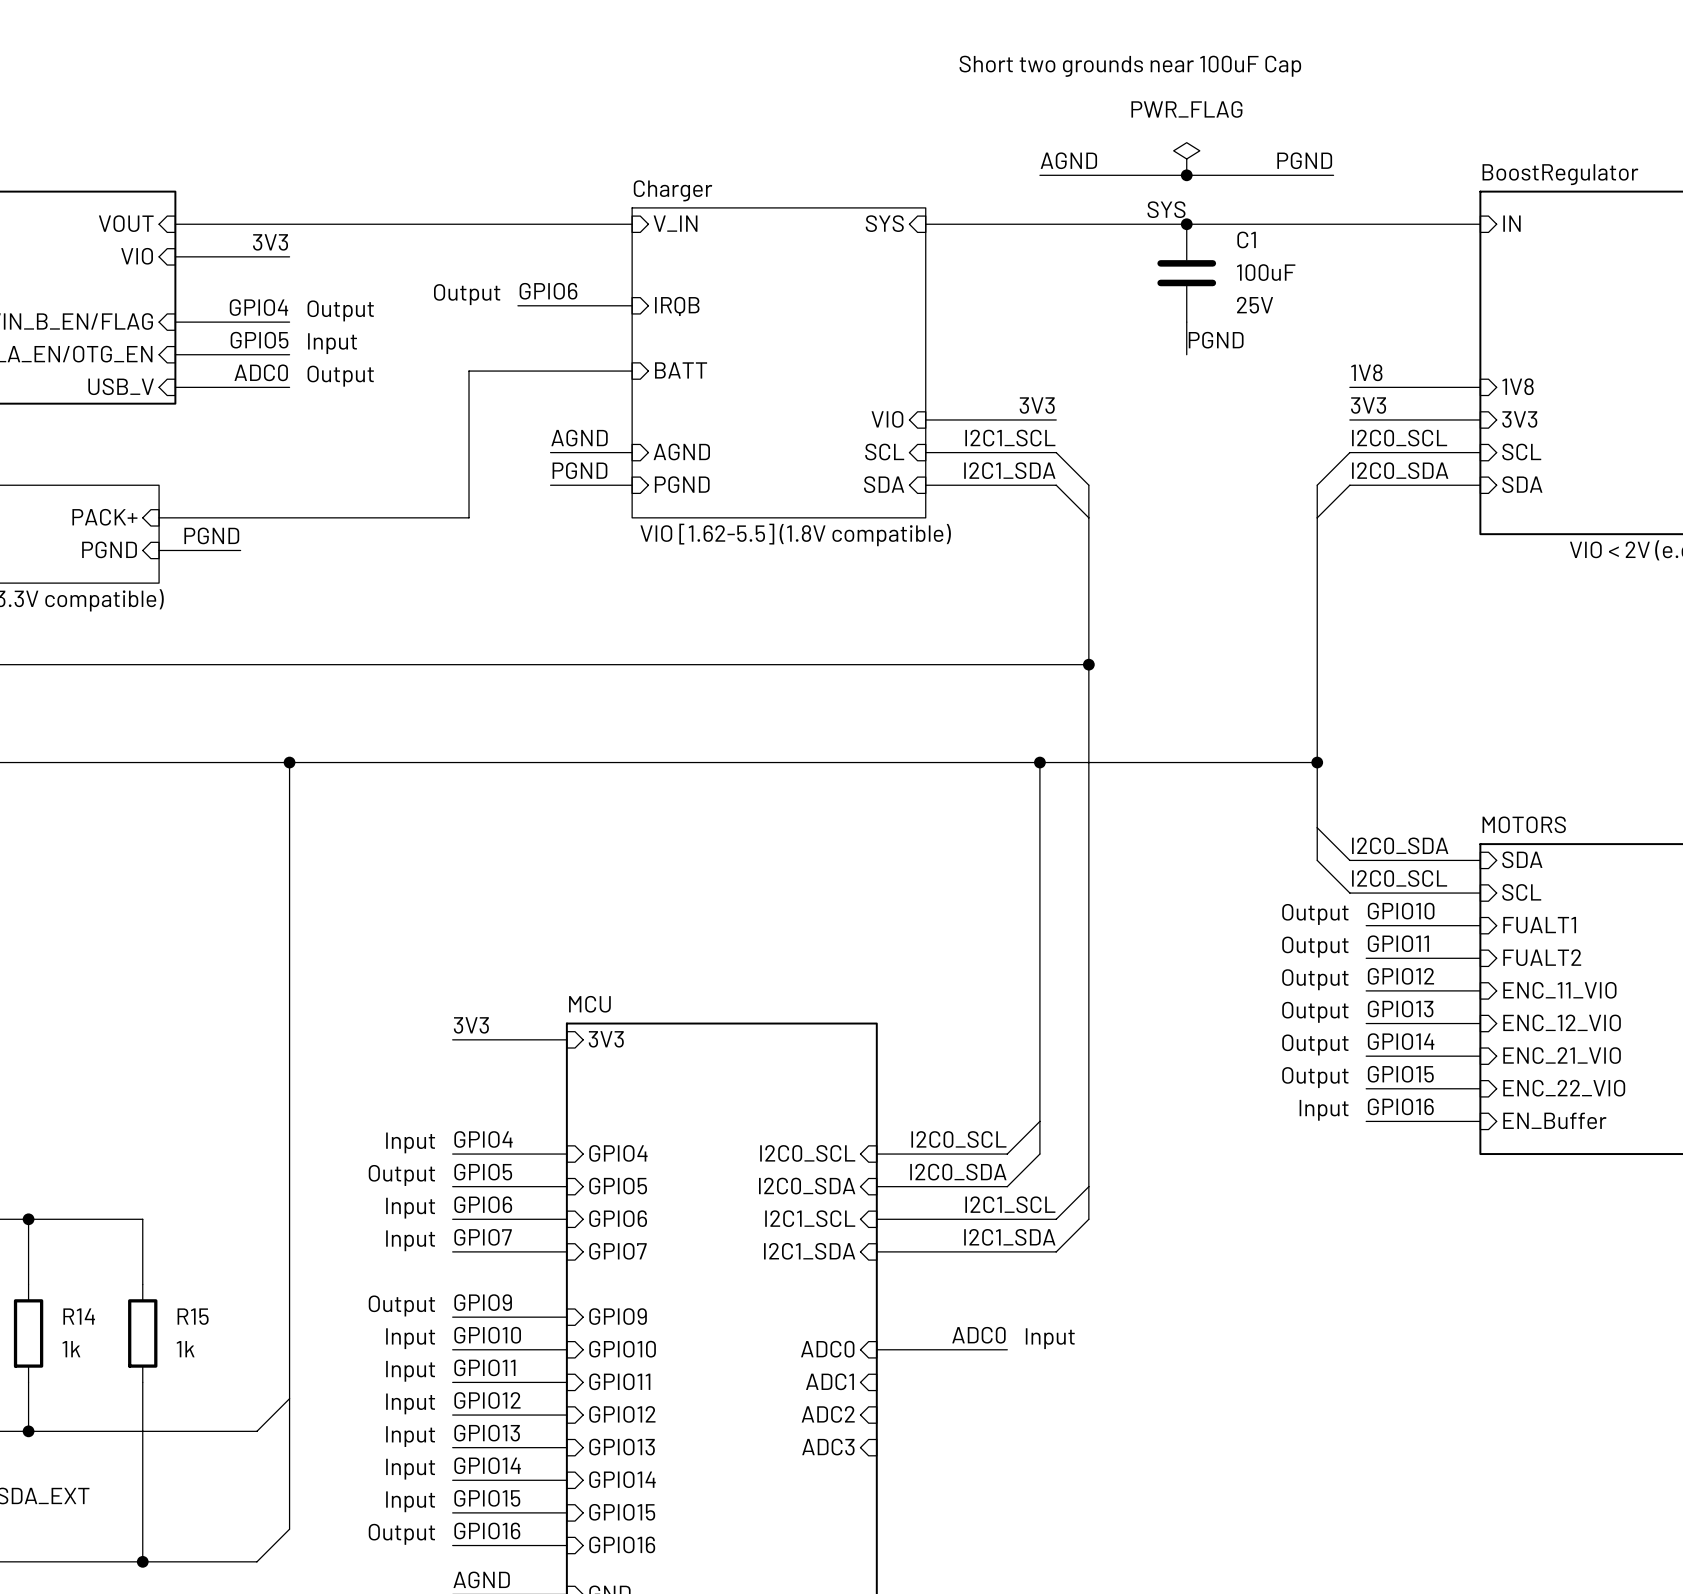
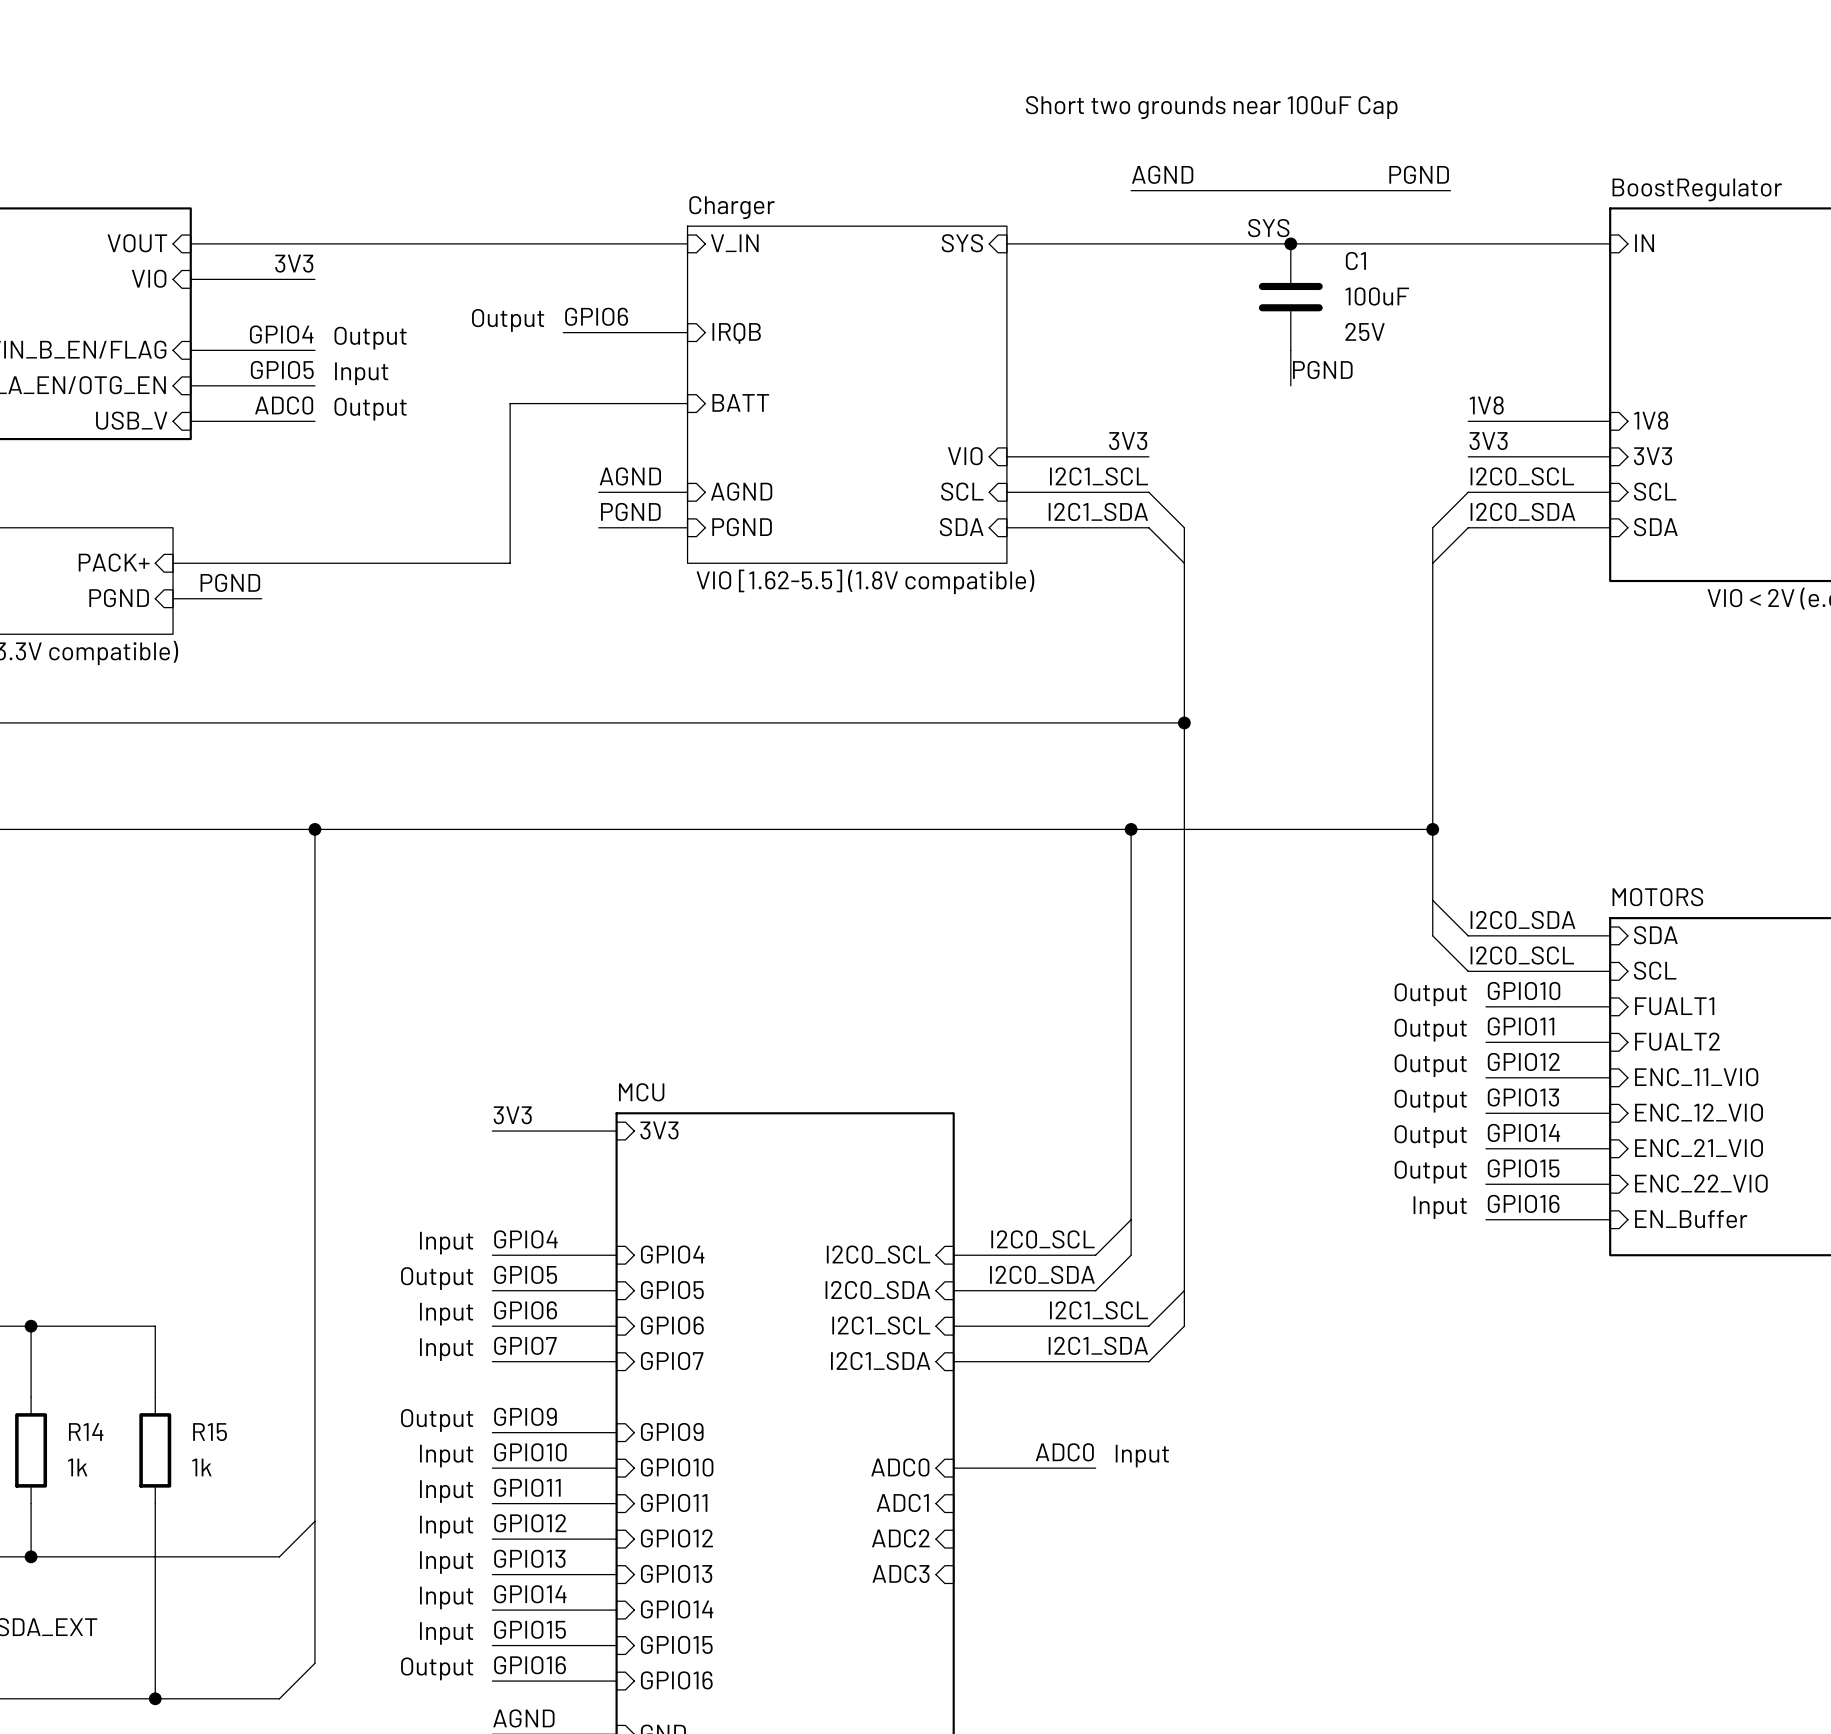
text position: Short two grounds near 100uF Cap (1130, 66) -> Short two grounds near 100uF Cap (1211, 107)
power symbol: PWR_FLAG (1186, 158) -> none
junction: (1186, 175) -> none

